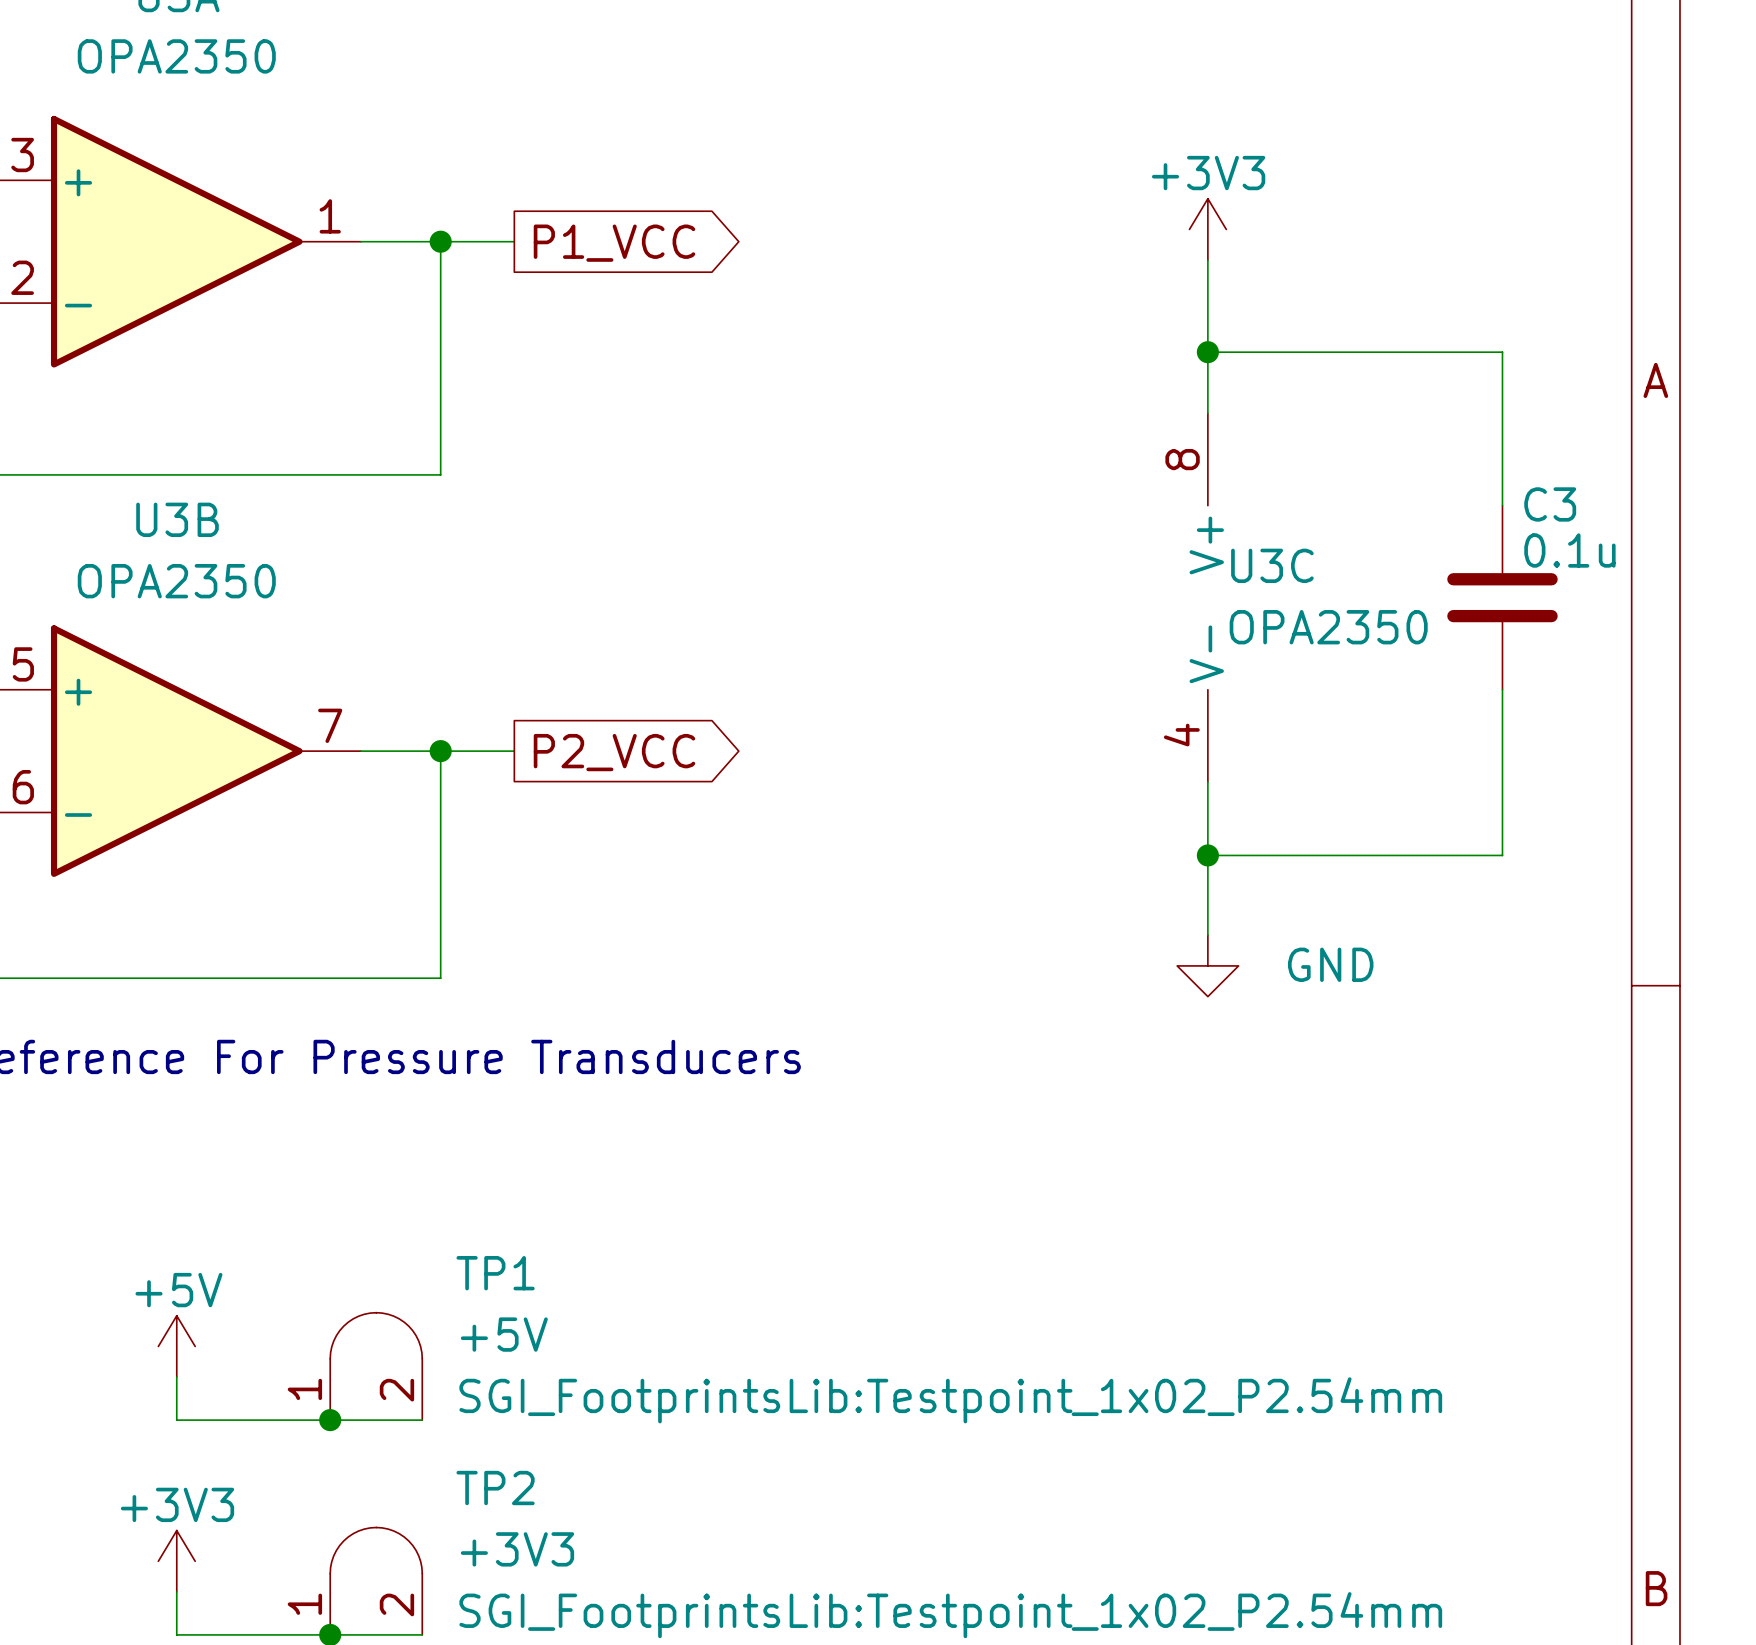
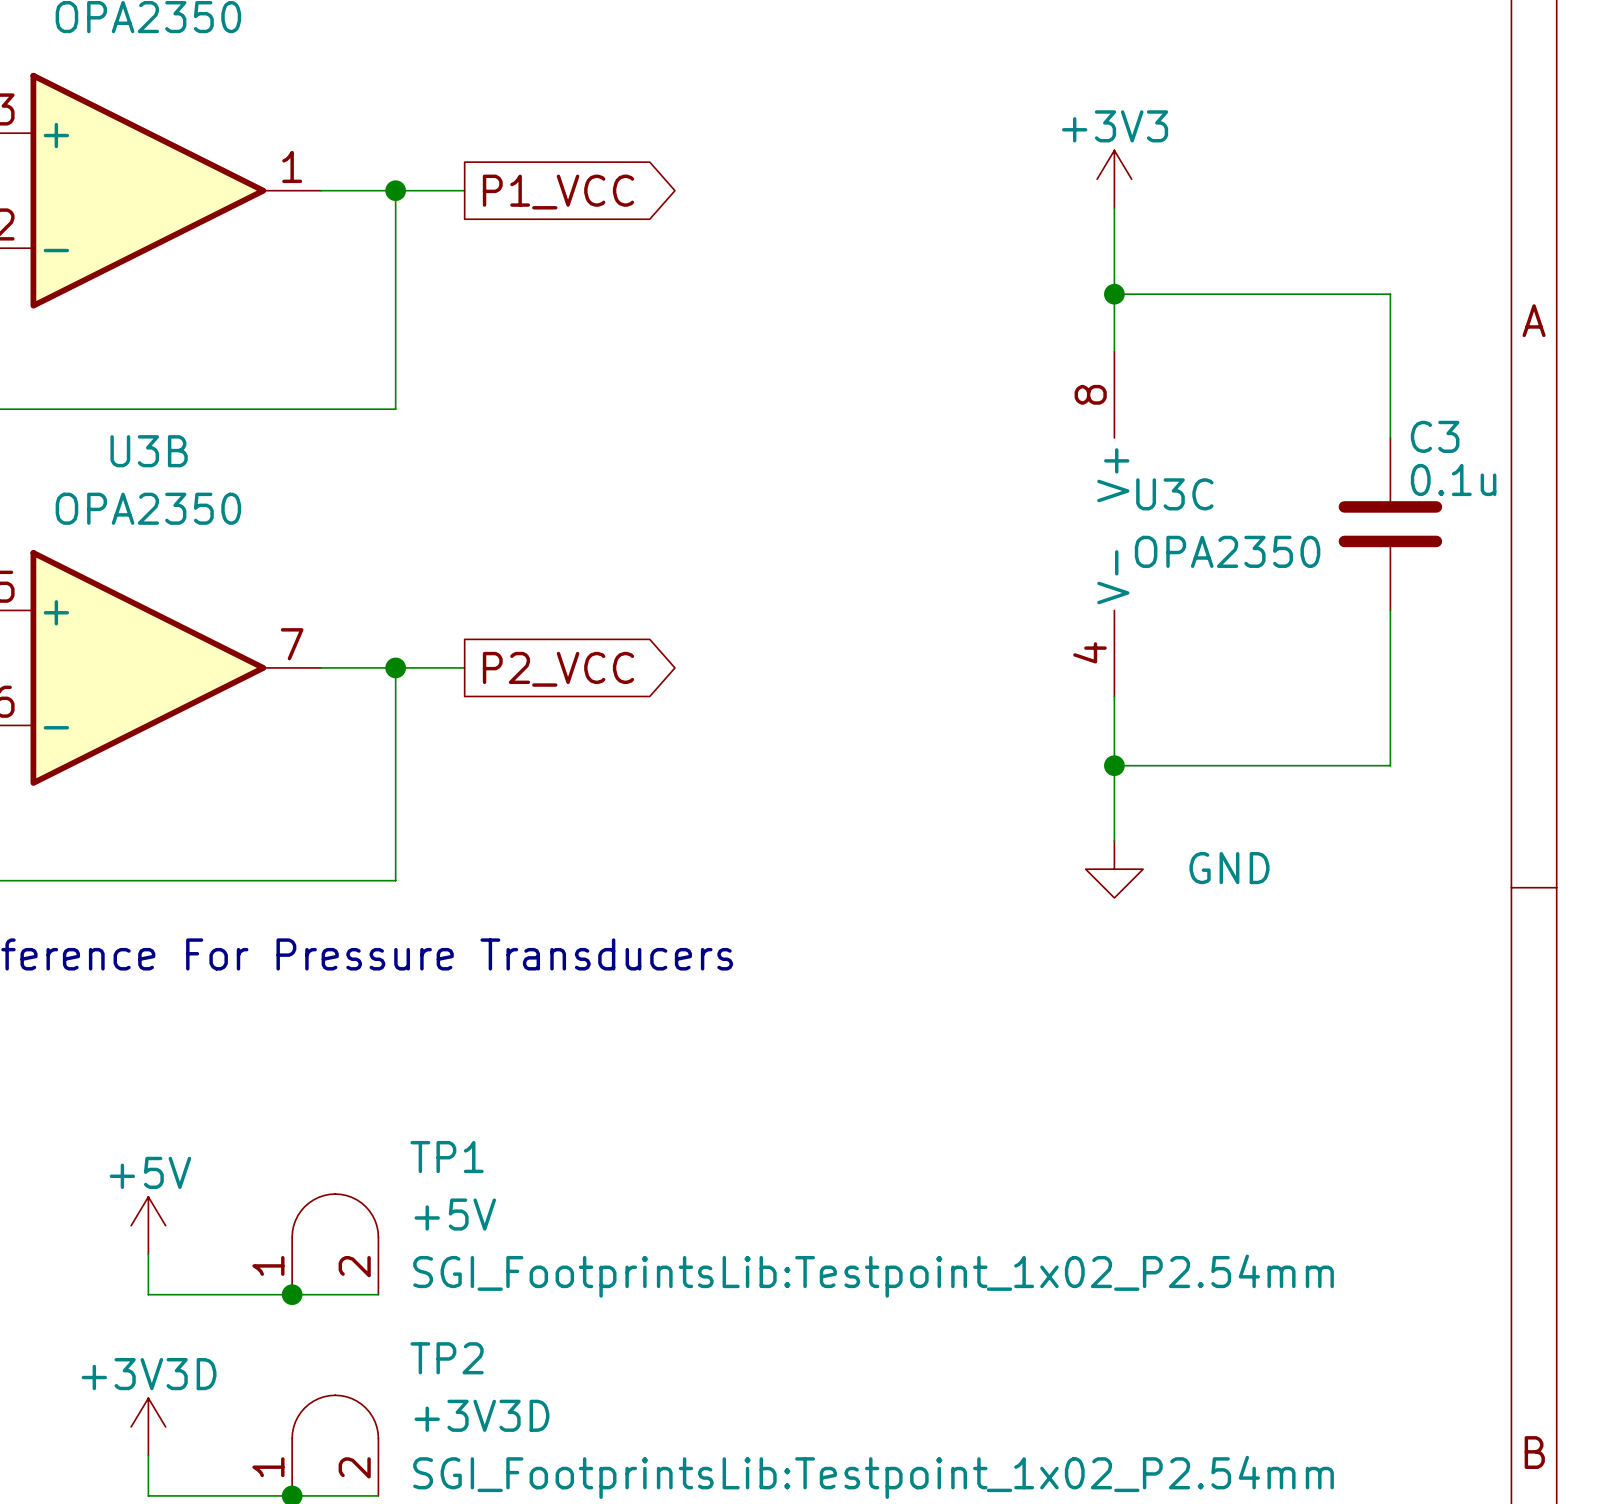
TP2 value: +3V3 (517, 1549) -> +3V3D (481, 1415)
power symbol: +3V3 (176, 1561) -> +3V3D (148, 1426)

